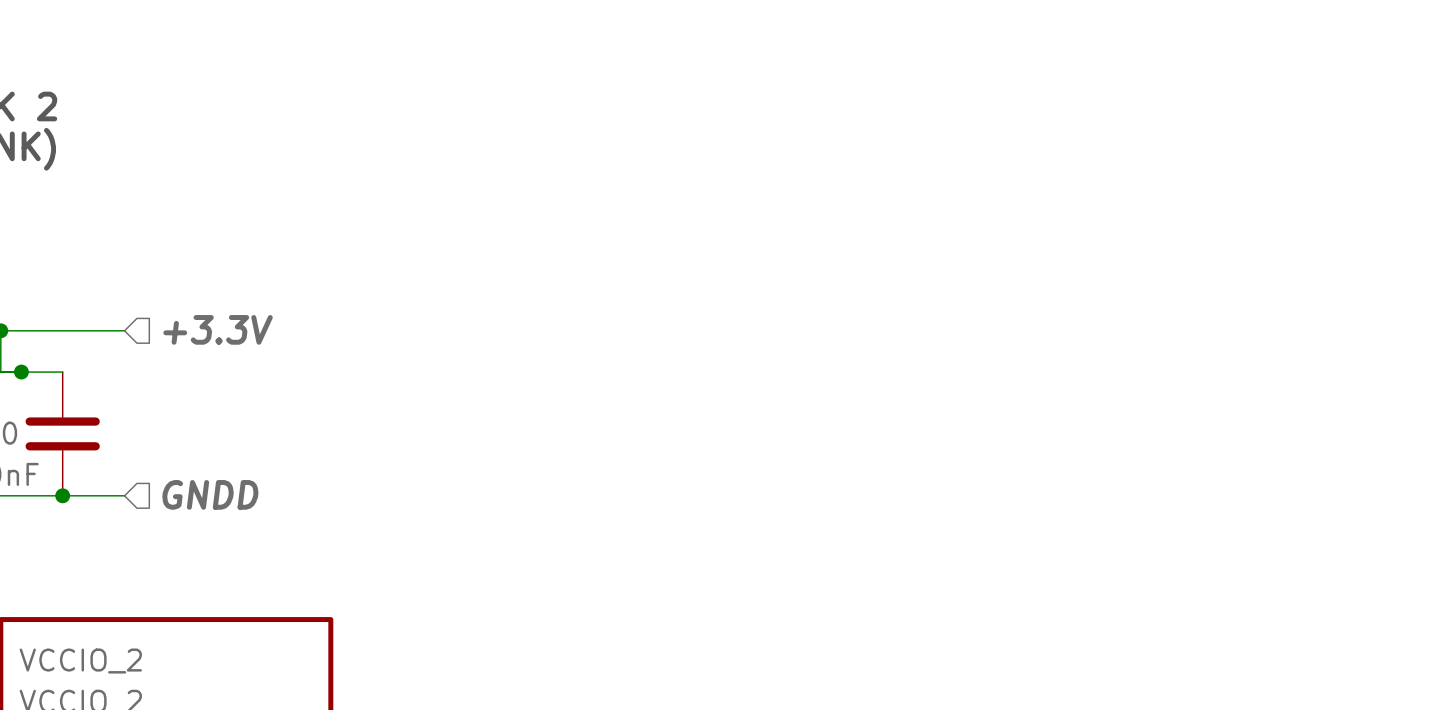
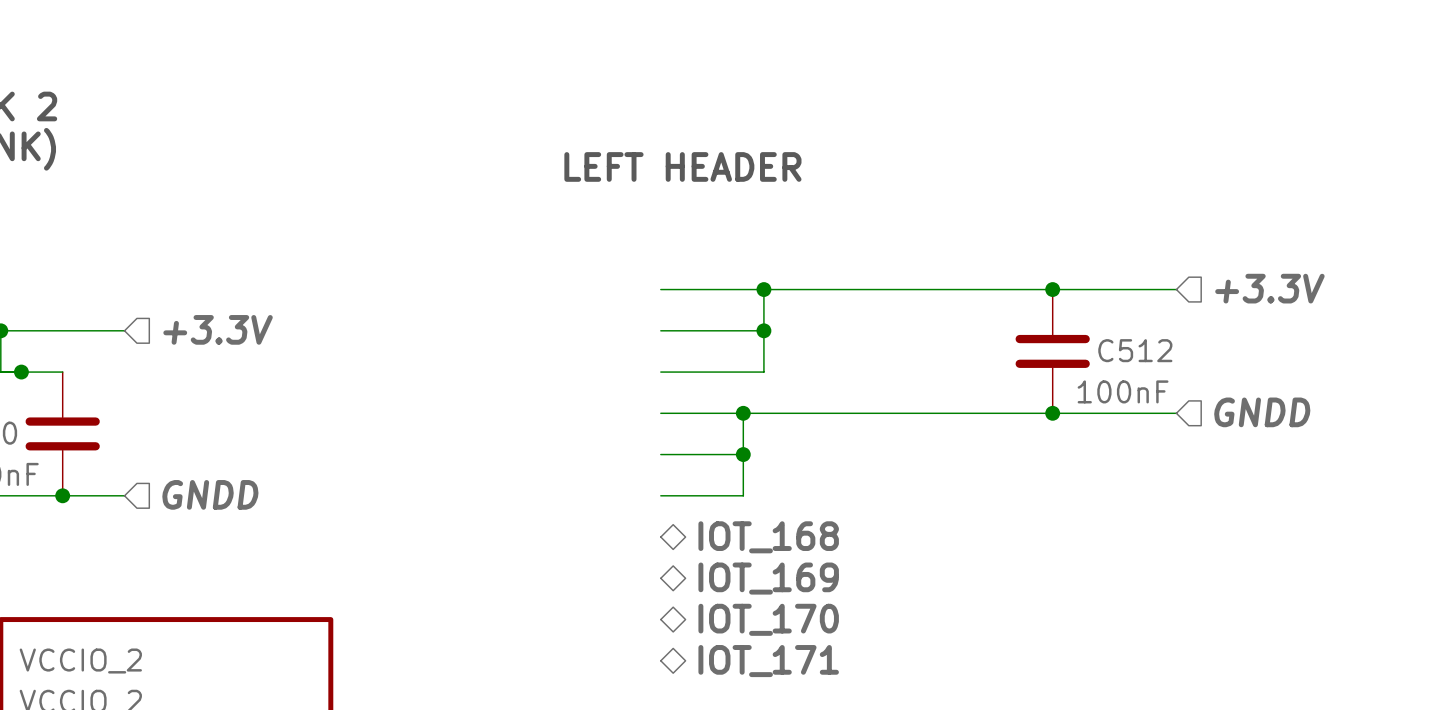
text: none -> LEFT HEADER (682, 166)
hierarchical label: none -> +3.3V (1269, 288)
wire: none -> (660, 289) (1176, 289)
wire: none -> (763, 289) (763, 372) (660, 372)
junction: none -> (763, 289)
junction: none -> (1052, 289)
wire: none -> (660, 330) (763, 330)
junction: none -> (763, 330)
C512: none -> 100nF (1052, 351)
hierarchical label: none -> GNDD (1262, 412)
wire: none -> (660, 413) (1176, 413)
wire: none -> (743, 413) (743, 495) (660, 495)
junction: none -> (743, 413)
junction: none -> (1052, 413)
wire: none -> (660, 454) (743, 454)
junction: none -> (743, 454)
hierarchical label: none -> IOT_168 (768, 537)
hierarchical label: none -> IOT_169 (768, 578)
hierarchical label: none -> IOT_170 (768, 619)
hierarchical label: none -> IOT_171 (768, 661)

